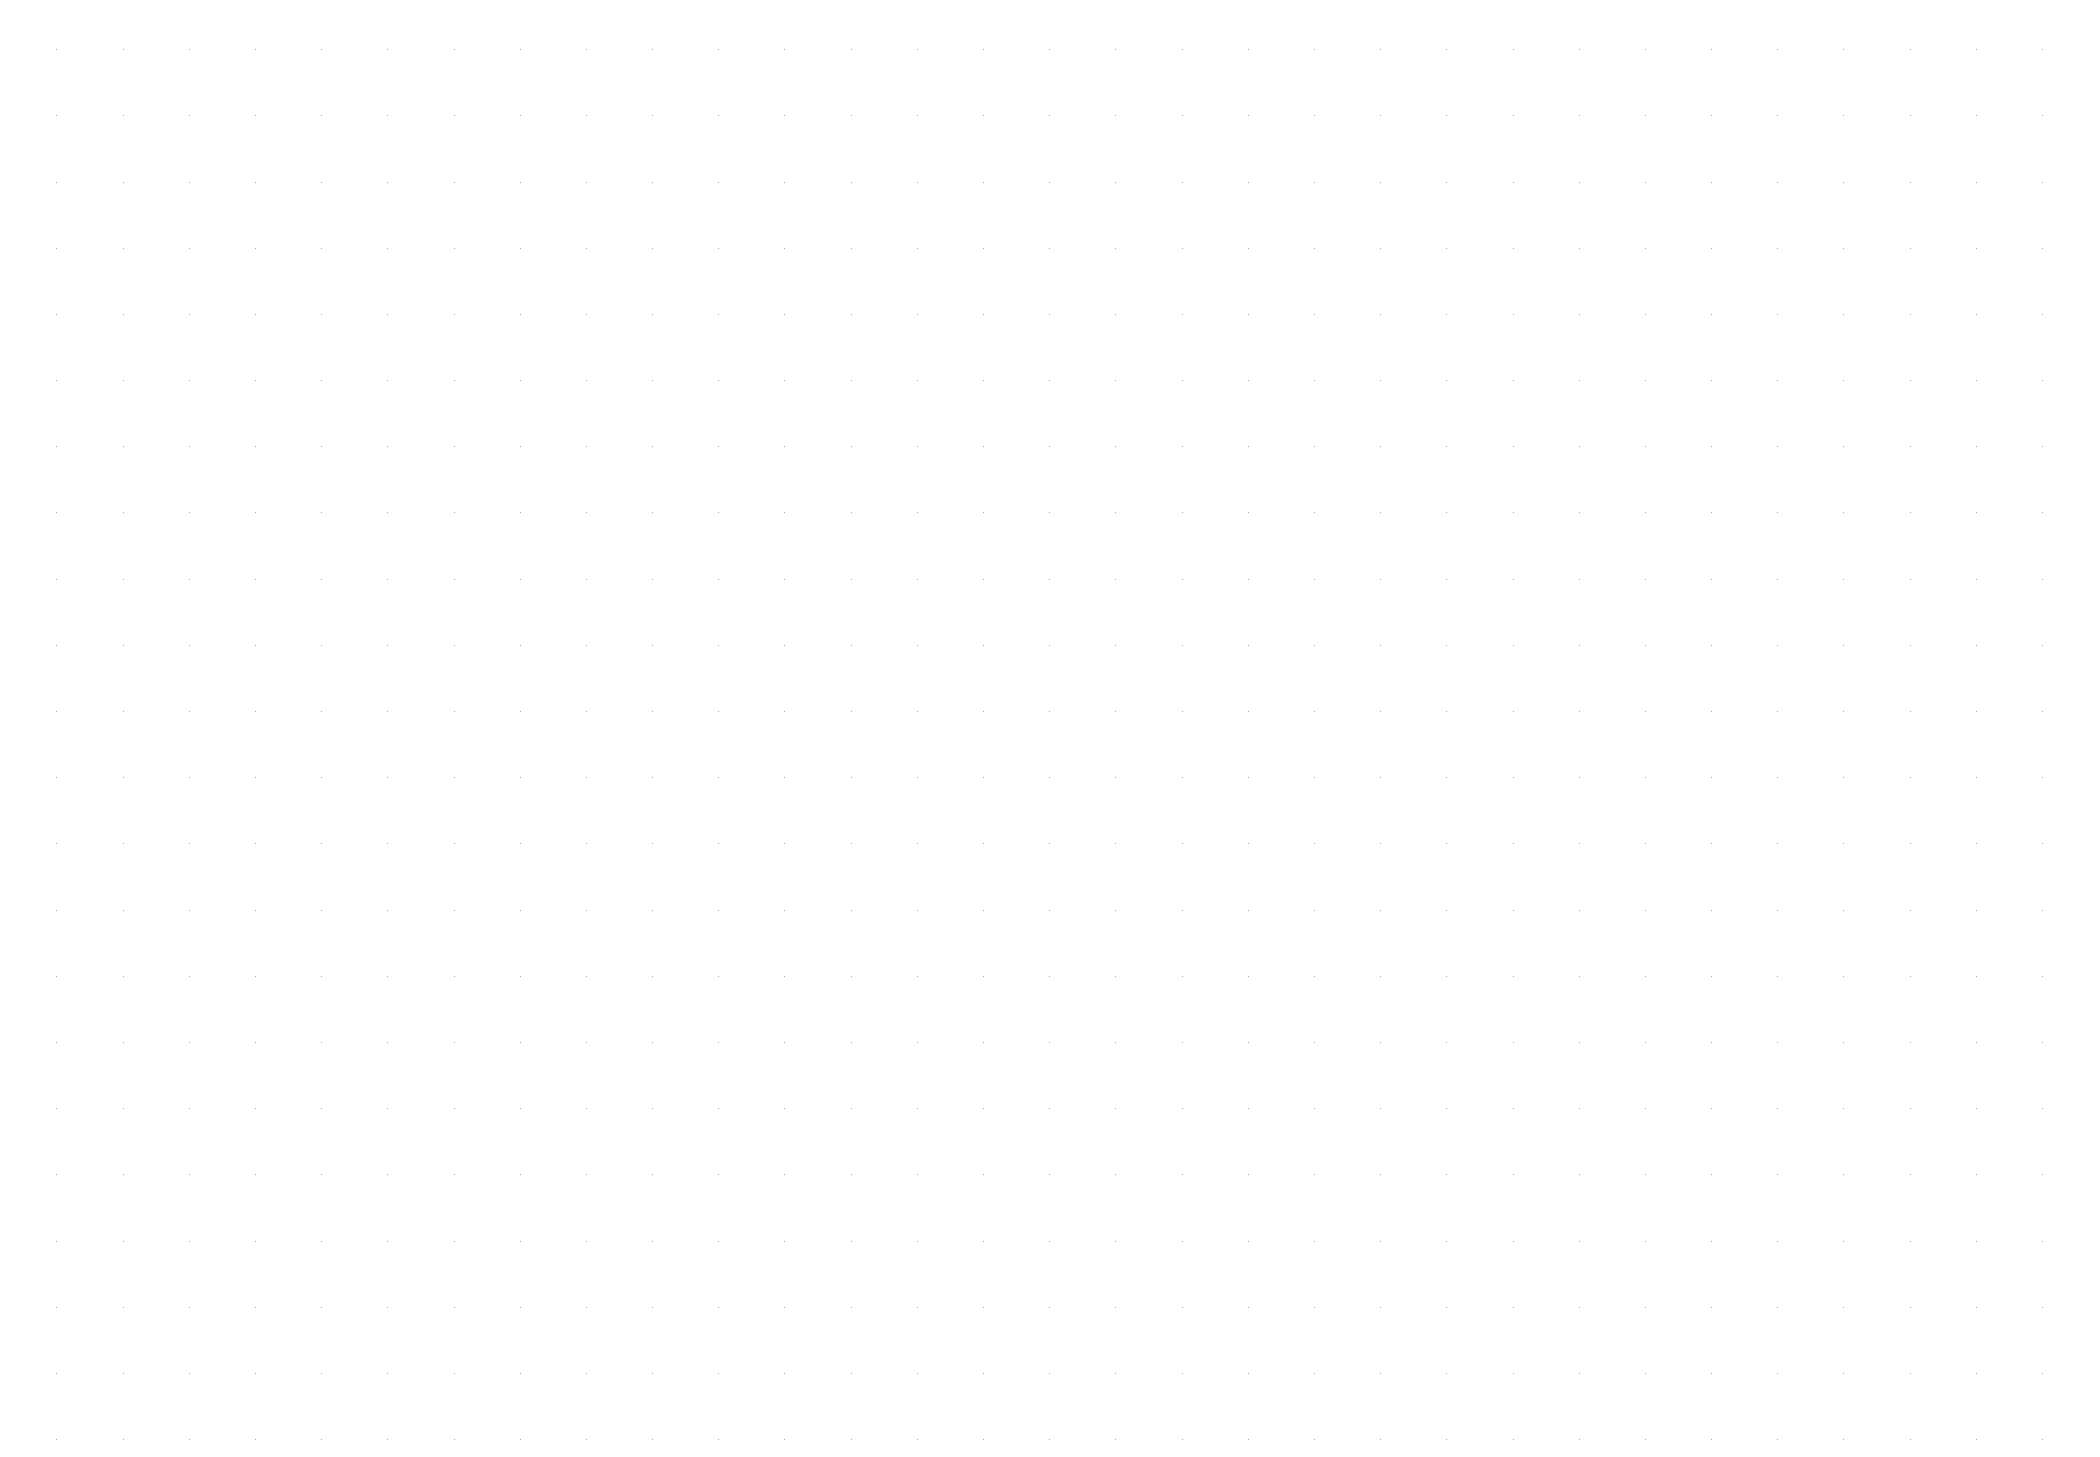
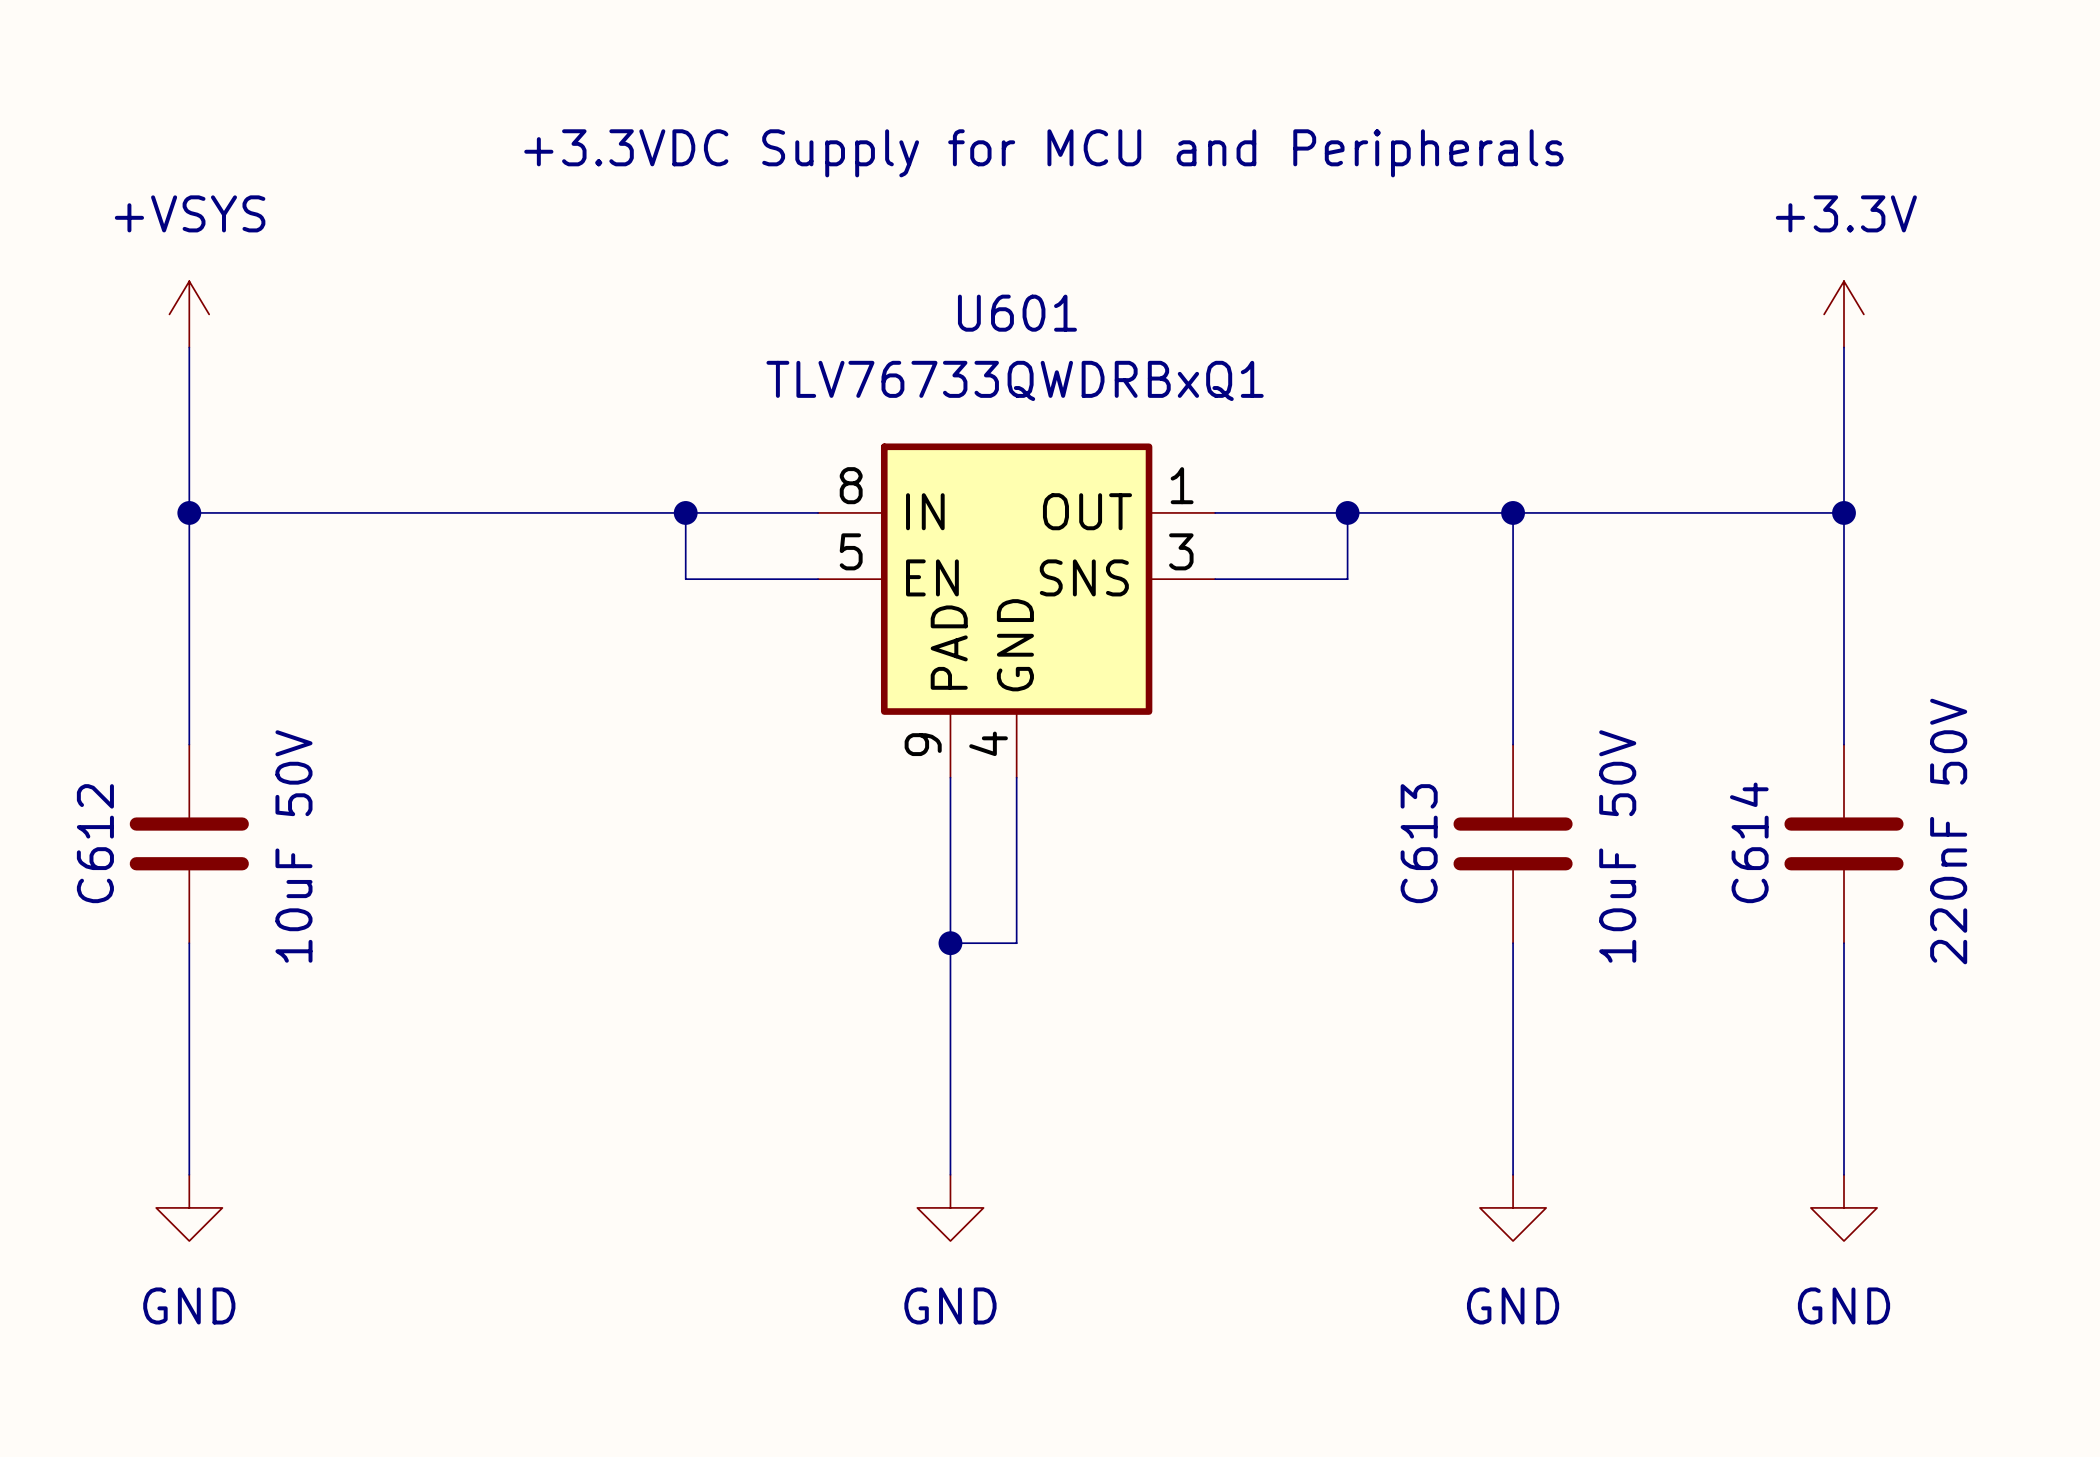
text: none -> +3.3VDC Supply for MCU and Peripherals (1043, 153)
power symbol: none -> +VSYS (189, 314)
power symbol: none -> +3.3V (1843, 314)
wire: none -> (189, 347) (189, 744)
wire: none -> (1843, 347) (1843, 744)
wire: none -> (189, 512) (818, 512)
junction: none -> (189, 512)
wire: none -> (685, 512) (685, 579) (818, 579)
junction: none -> (685, 512)
wire: none -> (1215, 512) (1843, 512)
wire: none -> (1347, 512) (1347, 579) (1215, 579)
junction: none -> (1347, 512)
wire: none -> (1513, 512) (1513, 744)
junction: none -> (1513, 512)
junction: none -> (1843, 512)
U601: none -> TLV76733QWDRBxQ1 (1016, 610)
wire: none -> (950, 777) (950, 1174)
wire: none -> (1016, 777) (1016, 943) (950, 943)
C612: none -> 10uF 50V (189, 843)
C613: none -> 10uF 50V (1513, 843)
C614: none -> 220nF 50V (1843, 843)
wire: none -> (189, 943) (189, 1174)
junction: none -> (950, 943)
wire: none -> (1513, 943) (1513, 1174)
wire: none -> (1843, 943) (1843, 1174)
power symbol: none -> GND (189, 1207)
power symbol: none -> GND (950, 1207)
power symbol: none -> GND (1513, 1207)
power symbol: none -> GND (1843, 1207)

